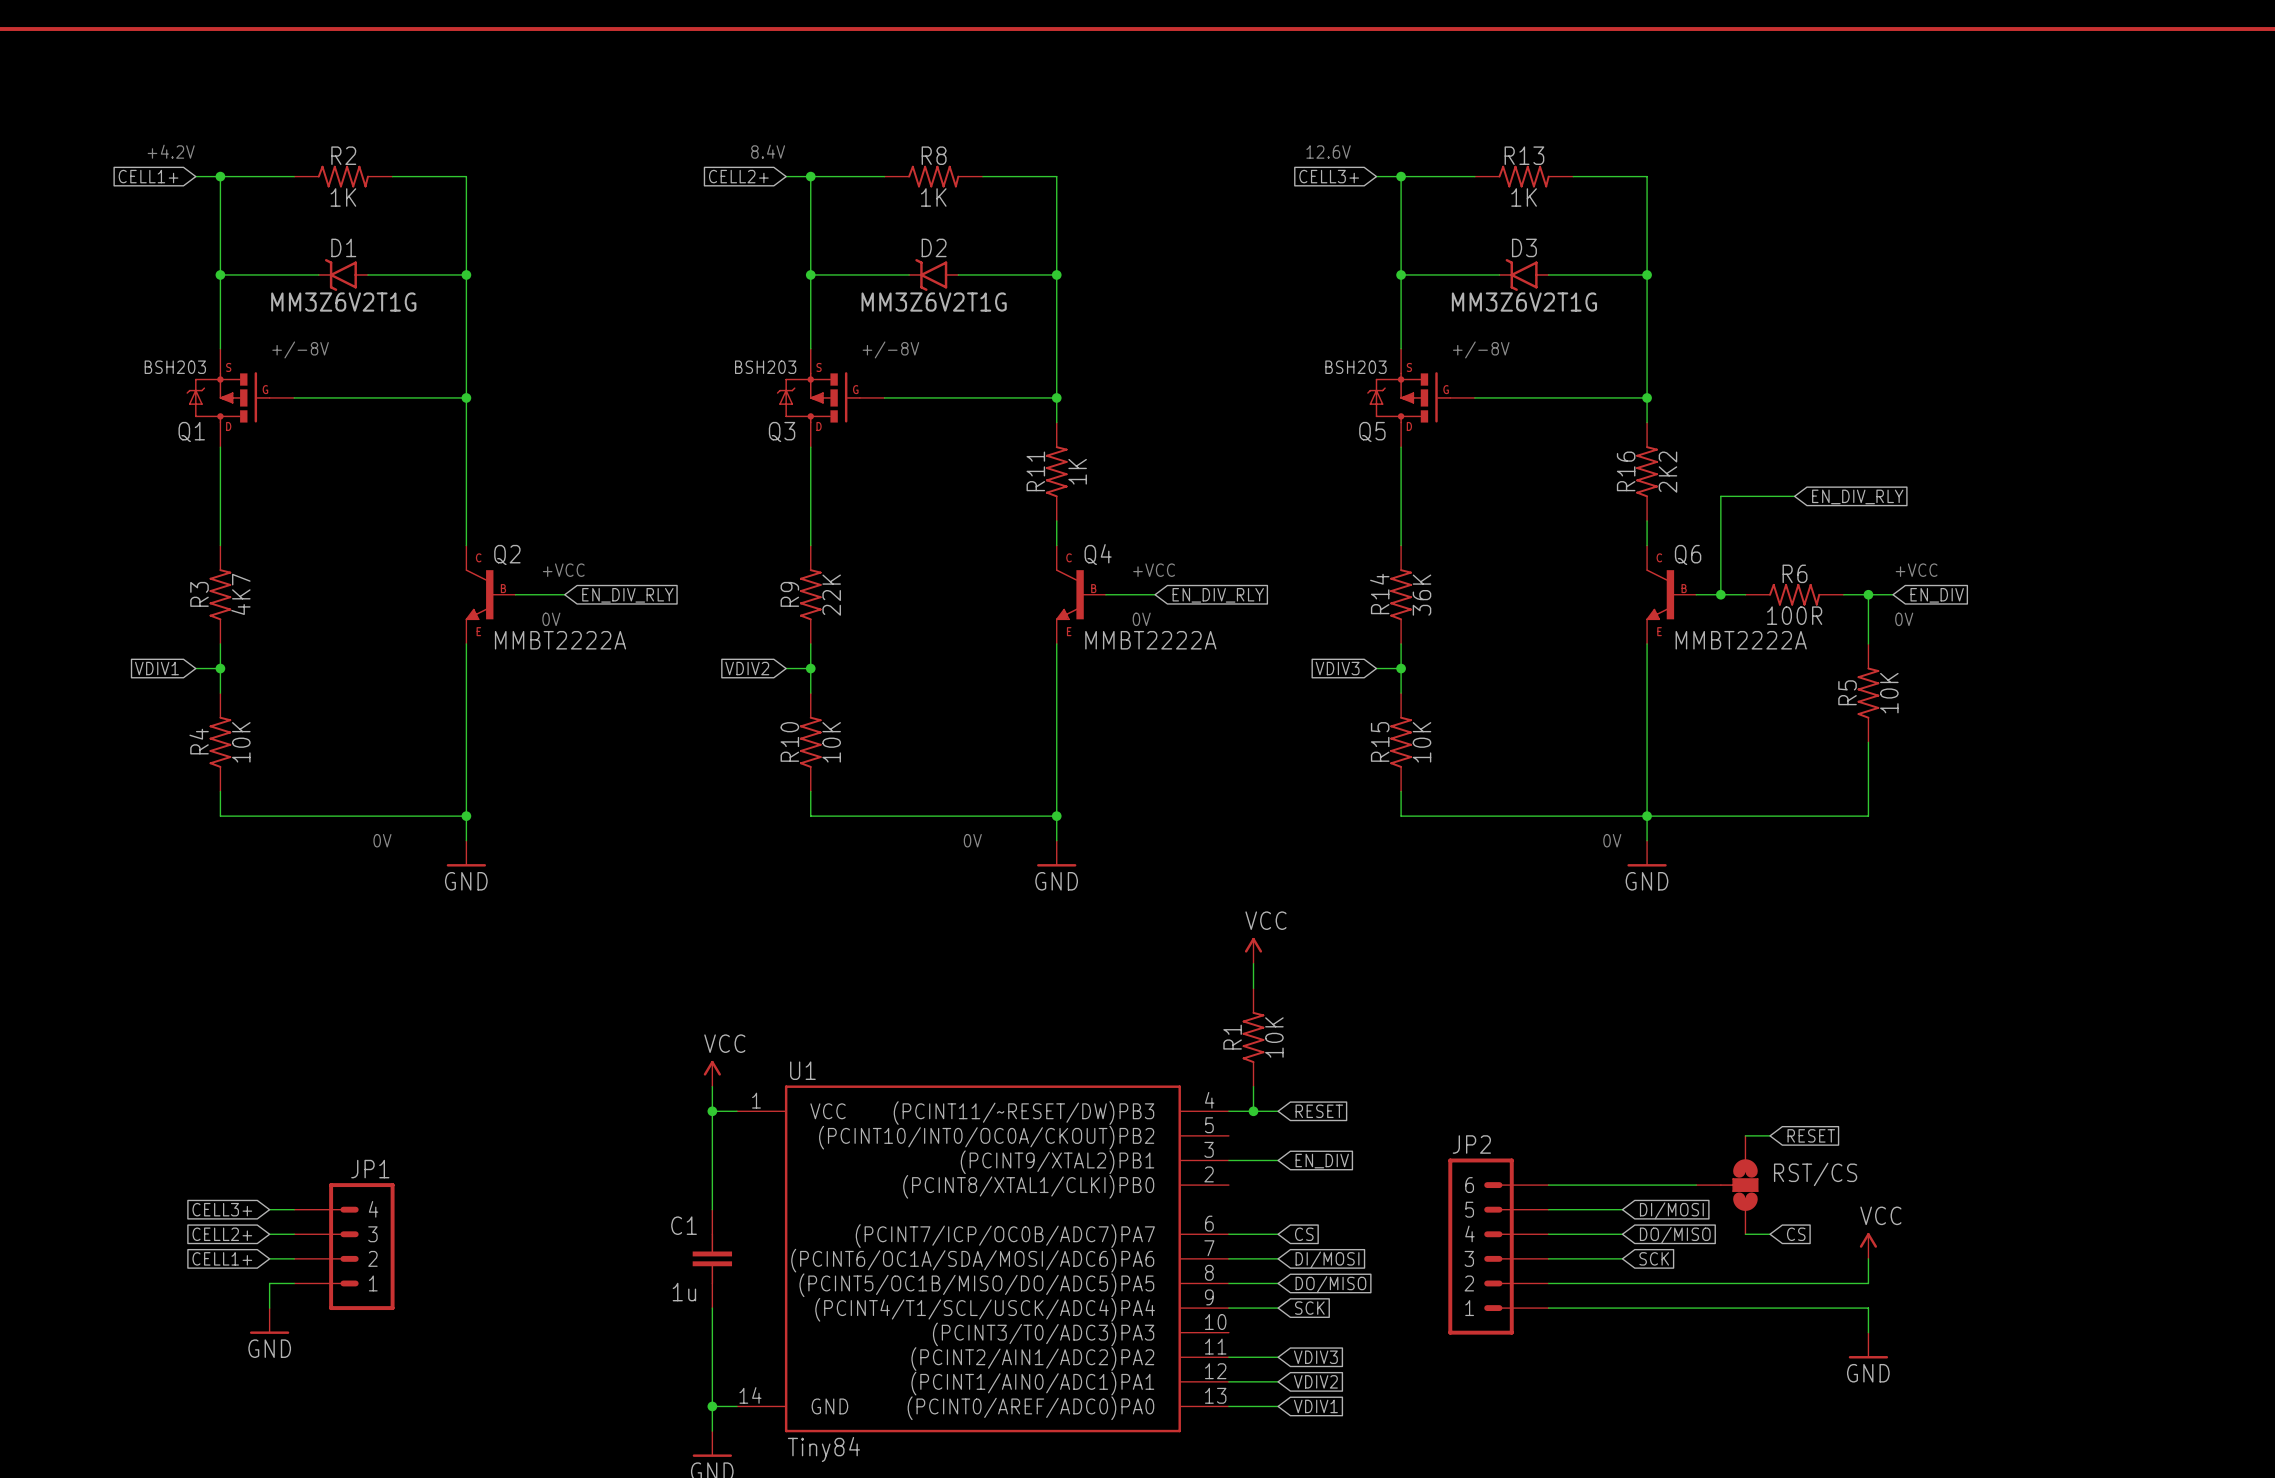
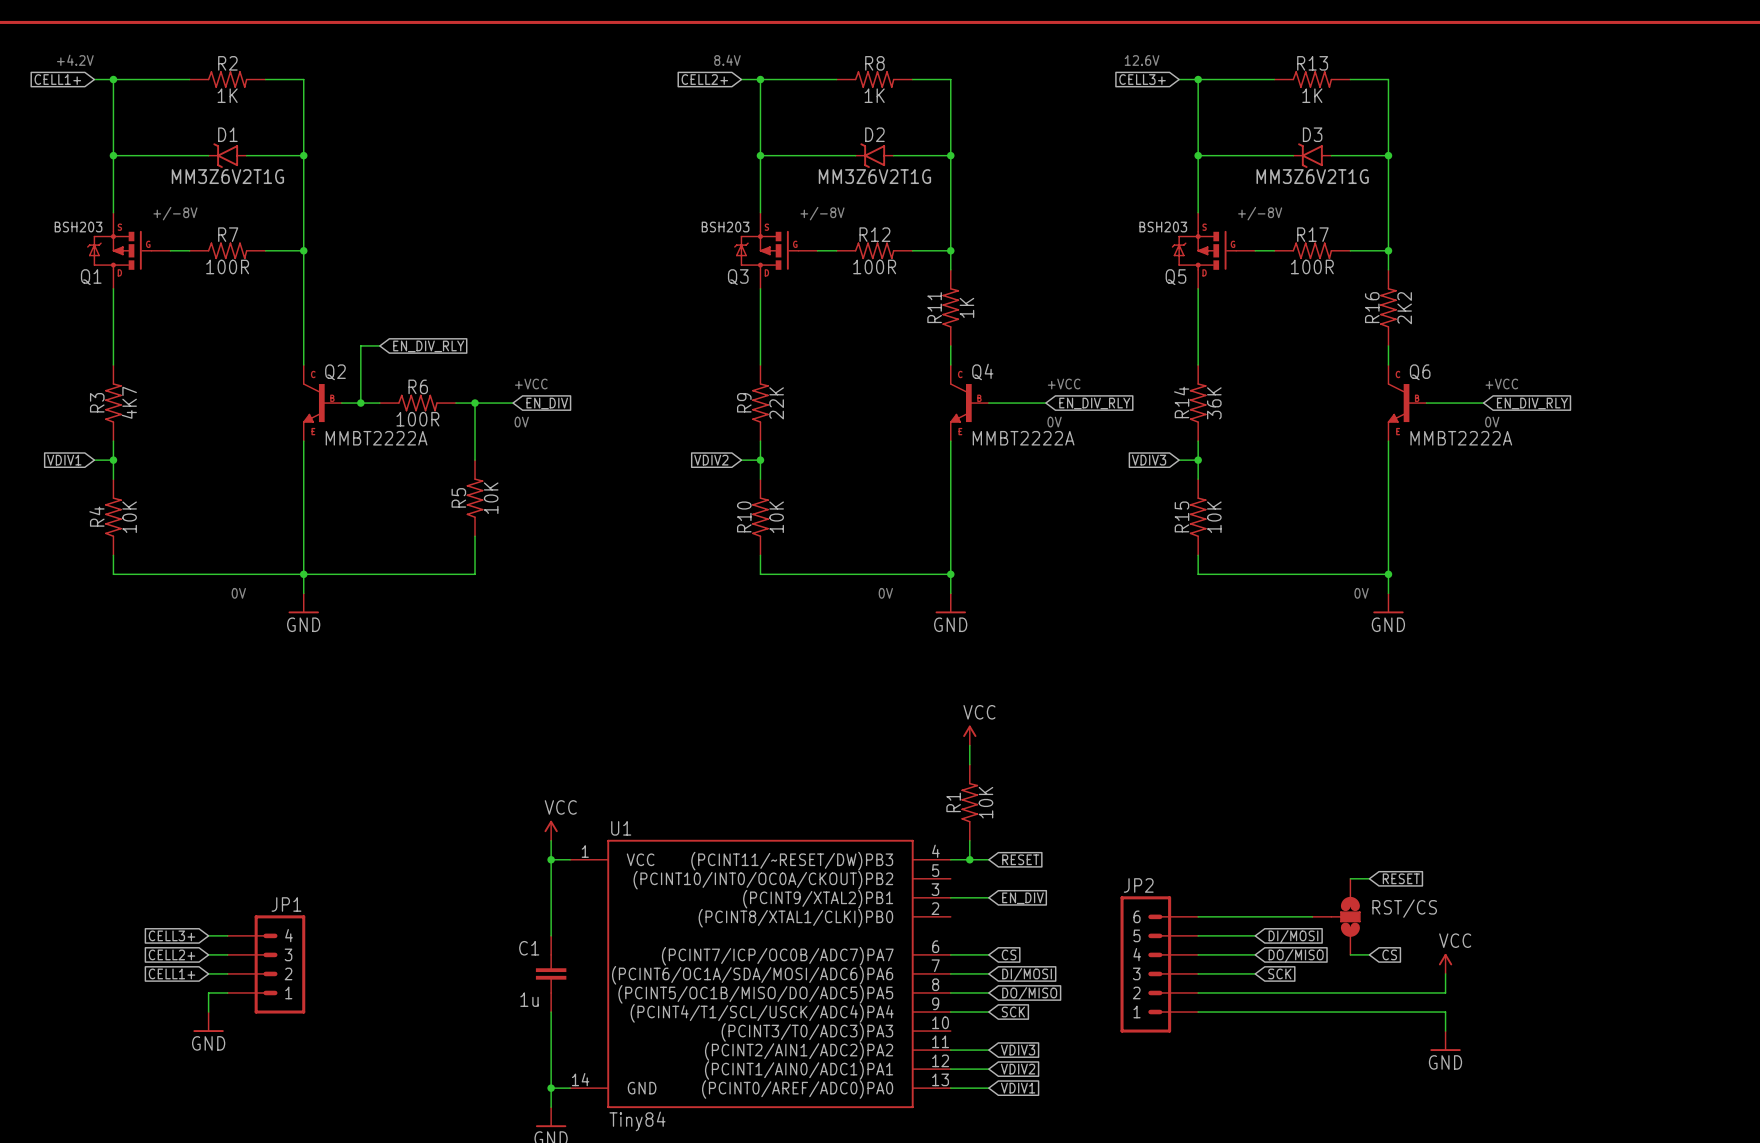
wire: none -> (94, 79) (189, 79)
junction: none -> (113, 79)
wire: none -> (265, 79) (303, 79) (303, 364)
wire: none -> (741, 79) (836, 79)
junction: none -> (760, 79)
wire: none -> (912, 79) (950, 79) (950, 269)
wire: none -> (1179, 79) (1274, 79)
junction: none -> (1198, 79)
wire: none -> (1350, 79) (1388, 79) (1388, 269)
text position: +4.2V (171, 151) -> +4.2V (75, 60)
text position: 8.4V (768, 151) -> 8.4V (727, 60)
text position: 12.6V (1328, 151) -> 12.6V (1142, 60)
global label position: CELL1+ (148, 176) -> CELL1+ (57, 79)
wire: (195, 176) (294, 176) -> none
wire: (220, 176) (220, 348) -> (113, 79) (113, 212)
junction: (220, 176) -> none
R2 position: (343, 176) -> (227, 79)
wire: (392, 176) (466, 176) (466, 447) -> (379, 345) (360, 345)
global label position: CELL2+ (738, 176) -> CELL2+ (704, 79)
wire: (786, 176) (884, 176) -> none
wire: (810, 176) (810, 348) -> (760, 79) (760, 212)
junction: (810, 176) -> none
R8 position: (933, 176) -> (874, 79)
wire: (982, 176) (1056, 176) (1056, 422) -> none
global label position: CELL3+ (1329, 176) -> CELL3+ (1142, 79)
wire: (1376, 176) (1474, 176) -> none
wire: (1401, 176) (1401, 348) -> none
junction: (1401, 176) -> none
R13 position: (1524, 176) -> (1312, 79)
wire: (1573, 176) (1647, 176) (1647, 422) -> none
wire: none -> (113, 155) (208, 155)
junction: none -> (113, 155)
wire: none -> (246, 155) (303, 155)
junction: none -> (303, 155)
wire: none -> (760, 155) (855, 155)
junction: none -> (760, 155)
wire: none -> (893, 155) (950, 155)
junction: none -> (950, 155)
wire: none -> (1198, 155) (1293, 155)
junction: none -> (1198, 155)
wire: none -> (1331, 155) (1388, 155)
junction: none -> (1388, 155)
wire: (220, 274) (318, 274) -> none
junction: (220, 274) -> none
D1 position: (343, 274) -> (227, 155)
wire: (368, 274) (466, 274) -> none
junction: (466, 274) -> none
wire: (810, 274) (909, 274) -> none
junction: (810, 274) -> none
D2 position: (933, 274) -> (874, 155)
wire: (958, 274) (1056, 274) -> none
junction: (1056, 274) -> none
wire: (1401, 274) (1499, 274) -> none
junction: (1401, 274) -> none
D3 position: (1524, 274) -> (1312, 155)
wire: (1548, 274) (1647, 274) -> (1198, 212) (1198, 79)
junction: (1647, 274) -> none
wire: none -> (170, 250) (189, 250)
R7: none -> 100R (227, 250)
wire: none -> (265, 250) (303, 250)
junction: none -> (303, 250)
wire: none -> (817, 250) (836, 250)
R12: none -> 100R (874, 250)
wire: none -> (912, 250) (950, 250)
junction: none -> (950, 250)
wire: none -> (1255, 250) (1274, 250)
R17: none -> 100R (1312, 250)
wire: none -> (1350, 250) (1388, 250)
junction: none -> (1388, 250)
text position: +/-8V (300, 349) -> +/-8V (175, 213)
text position: +/-8V (890, 349) -> +/-8V (822, 213)
text position: +/-8V (1481, 349) -> +/-8V (1260, 213)
Q1 position: (240, 397) -> (128, 250)
wire: (294, 397) (466, 397) -> none
junction: (466, 397) -> none
Q3 position: (830, 397) -> (775, 250)
wire: (884, 397) (1056, 397) -> none
junction: (1056, 397) -> none
Q5 position: (1421, 397) -> (1213, 250)
wire: (1474, 397) (1647, 397) -> none
junction: (1647, 397) -> none
wire: (220, 447) (220, 545) -> (113, 288) (113, 364)
wire: (810, 447) (810, 545) -> (760, 288) (760, 364)
wire: (1401, 447) (1401, 545) -> (1198, 288) (1198, 364)
R11 position: (1056, 471) -> (950, 307)
R16 position: (1647, 471) -> (1388, 307)
wire: (1794, 496) (1720, 496) (1720, 594) -> none
global label position: EN_DIV_RLY (1857, 496) -> EN_DIV_RLY (1532, 403)
wire: (466, 520) (466, 545) -> none
junction: none -> (360, 403)
wire: none -> (455, 403) (513, 403)
wire: none -> (475, 403) (475, 460)
junction: none -> (475, 403)
wire: (1056, 520) (1056, 545) -> (950, 345) (950, 364)
wire: none -> (988, 403) (1045, 403)
wire: (1647, 520) (1647, 545) -> (1388, 345) (1388, 364)
wire: none -> (1426, 403) (1483, 403)
global label: none -> EN_DIV (547, 403)
text: none -> 0V (521, 422)
text: none -> 0V (1054, 422)
text position: +VCC (563, 570) -> +VCC (531, 384)
text position: +VCC (1154, 570) -> +VCC (1064, 384)
text position: +VCC (1916, 570) -> +VCC (1501, 384)
junction: none -> (113, 460)
R3 position: (220, 594) -> (113, 403)
Q2 position: (490, 594) -> (322, 403)
wire: (515, 594) (564, 594) -> (341, 403) (379, 403)
R9 position: (810, 594) -> (760, 403)
junction: none -> (760, 460)
Q4 position: (1080, 594) -> (969, 403)
wire: (1105, 594) (1155, 594) -> none
R14 position: (1401, 594) -> (1198, 403)
junction: none -> (1198, 460)
Q6 position: (1671, 594) -> (1407, 403)
wire: (1696, 594) (1745, 594) -> none
junction: (1720, 594) -> none
R6 position: (1794, 594) -> (417, 403)
wire: (1843, 594) (1893, 594) -> none
wire: (1868, 594) (1868, 643) -> none
junction: (1868, 594) -> none
global label position: EN_DIV_RLY (627, 595) -> EN_DIV_RLY (428, 346)
global label position: EN_DIV_RLY (1218, 595) -> EN_DIV_RLY (1094, 403)
global label: EN_DIV (1937, 595) -> none
text: 0V (551, 619) -> none
text: 0V (1141, 619) -> none
text position: 0V (1904, 619) -> 0V (1492, 422)
wire: (220, 643) (220, 693) -> (113, 441) (113, 479)
wire: (466, 643) (466, 840) -> (303, 441) (303, 593)
wire: (810, 643) (810, 693) -> (760, 441) (760, 479)
wire: (1056, 643) (1056, 840) -> (950, 441) (950, 593)
wire: (1401, 643) (1401, 693) -> (1198, 441) (1198, 479)
wire: (1647, 643) (1647, 840) -> (1388, 441) (1388, 593)
global label position: VDIV1 (156, 668) -> VDIV1 (64, 460)
wire: (195, 668) (220, 668) -> (94, 460) (113, 460)
junction: (220, 668) -> none
global label position: VDIV2 (747, 668) -> VDIV2 (711, 460)
wire: (786, 668) (810, 668) -> (741, 460) (760, 460)
junction: (810, 668) -> none
global label position: VDIV3 (1337, 668) -> VDIV3 (1149, 460)
wire: (1376, 668) (1401, 668) -> (1179, 460) (1198, 460)
junction: (1401, 668) -> none
wire: none -> (475, 536) (475, 574) (113, 574) (113, 555)
R5 position: (1868, 693) -> (475, 498)
wire: none -> (1198, 555) (1198, 574) (1388, 574)
R4 position: (220, 742) -> (113, 517)
junction: none -> (303, 574)
R10 position: (810, 742) -> (760, 517)
junction: none -> (950, 574)
R15 position: (1401, 742) -> (1198, 517)
junction: none -> (1388, 574)
wire: (1868, 742) (1868, 816) (1401, 816) (1401, 791) -> none
text: none -> 0V (885, 593)
text: none -> 0V (1361, 593)
wire: (220, 791) (220, 816) (466, 816) -> none
wire: (810, 791) (810, 816) (1056, 816) -> (760, 555) (760, 574) (950, 574)
junction: (466, 816) -> none
junction: (1056, 816) -> none
junction: (1647, 816) -> none
text position: 0V (382, 840) -> 0V (238, 593)
text: 0V (972, 840) -> none
text: 0V (1612, 840) -> none
power symbol position: GND (466, 853) -> GND (303, 603)
power symbol position: GND (1056, 853) -> GND (950, 603)
power symbol position: GND (1647, 853) -> GND (1388, 603)

